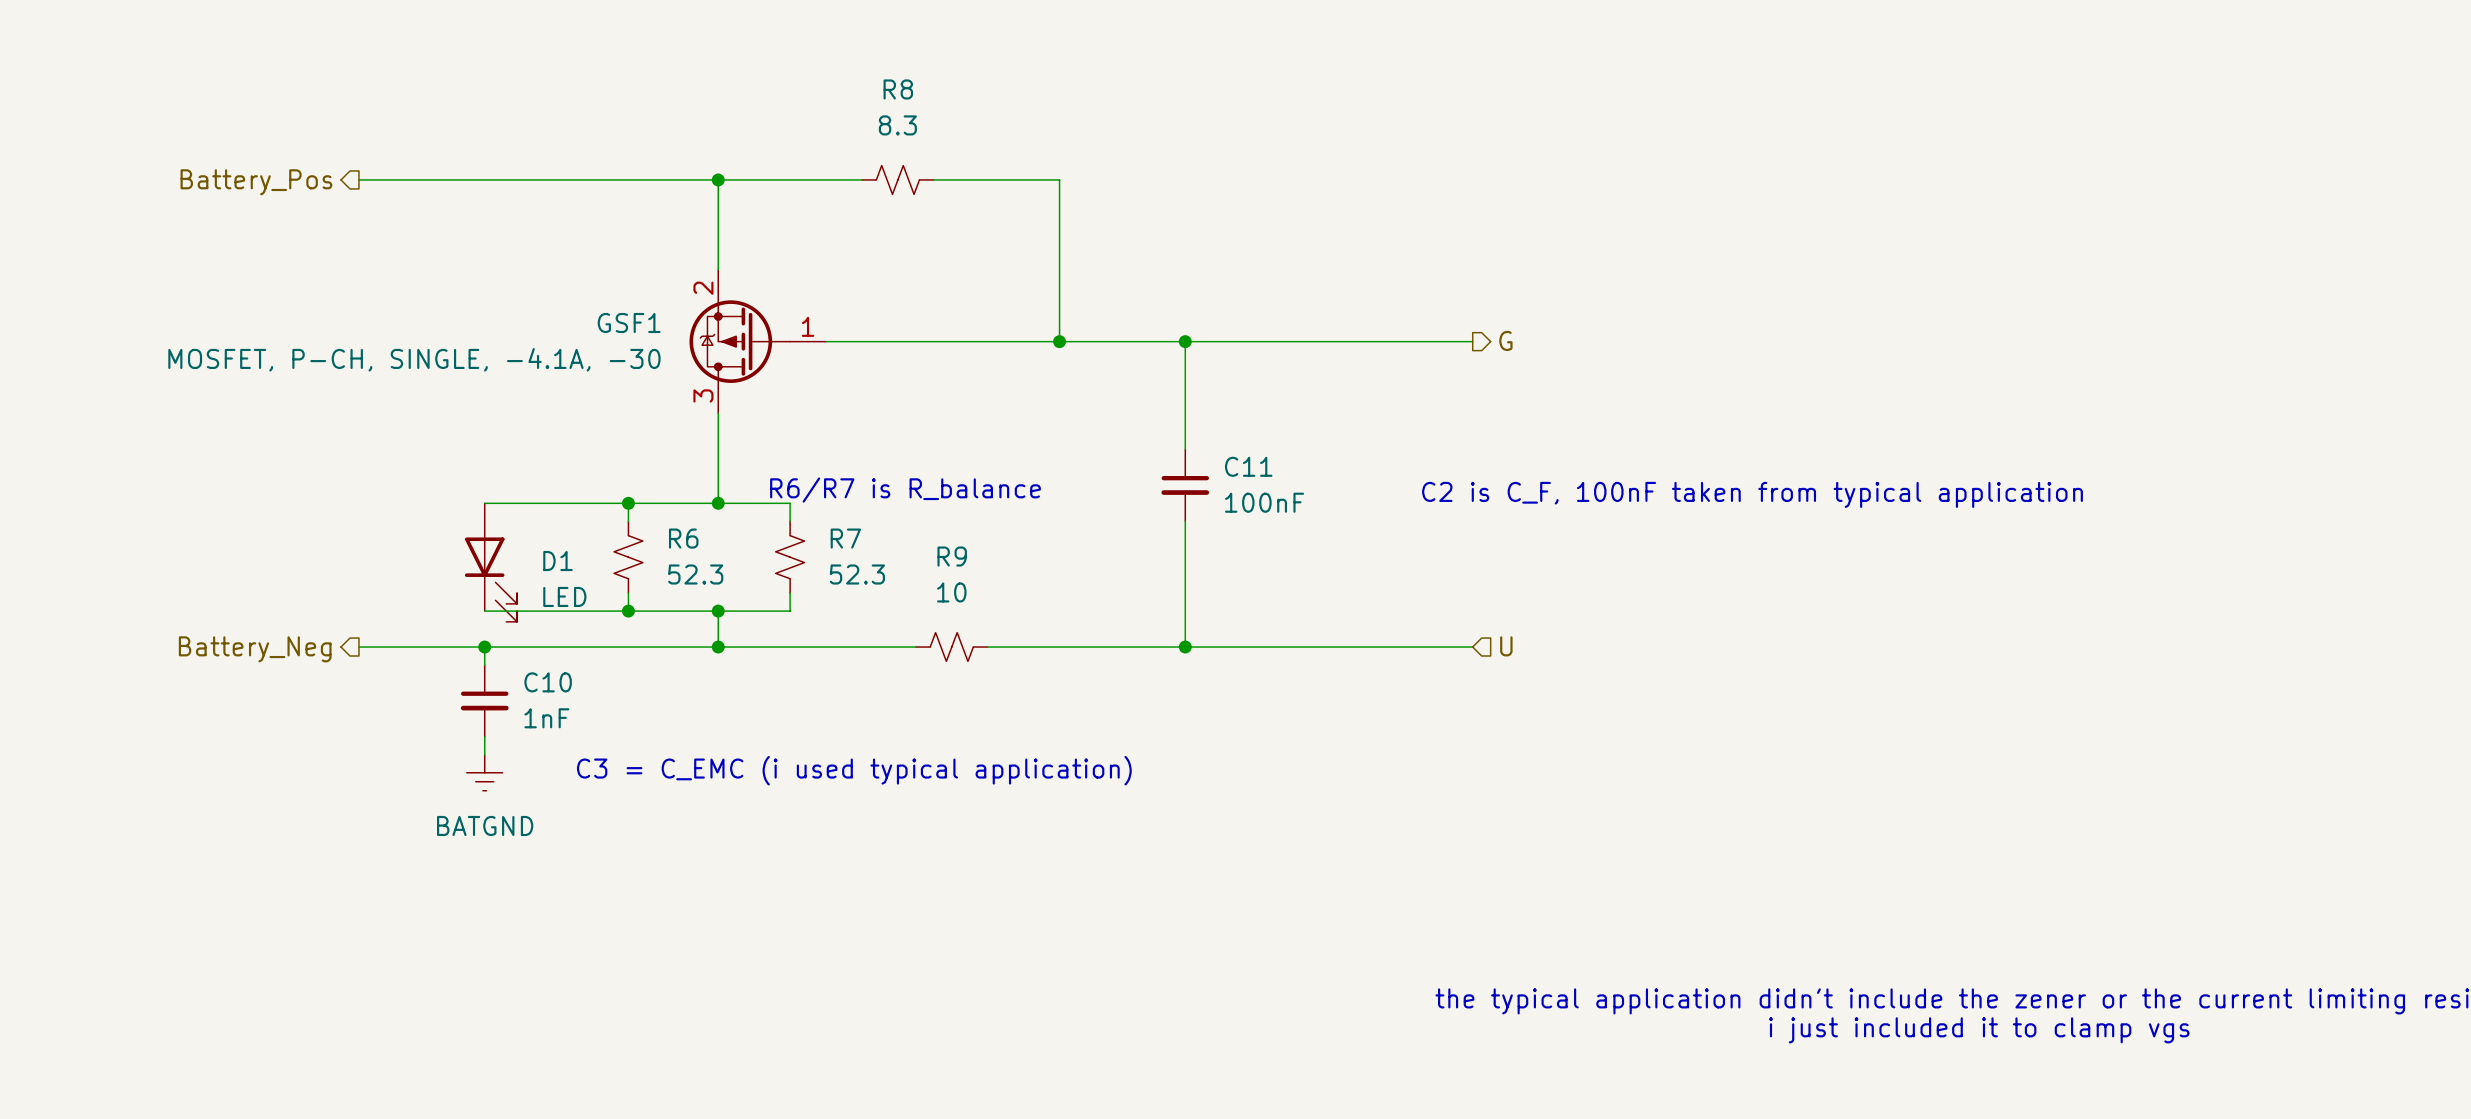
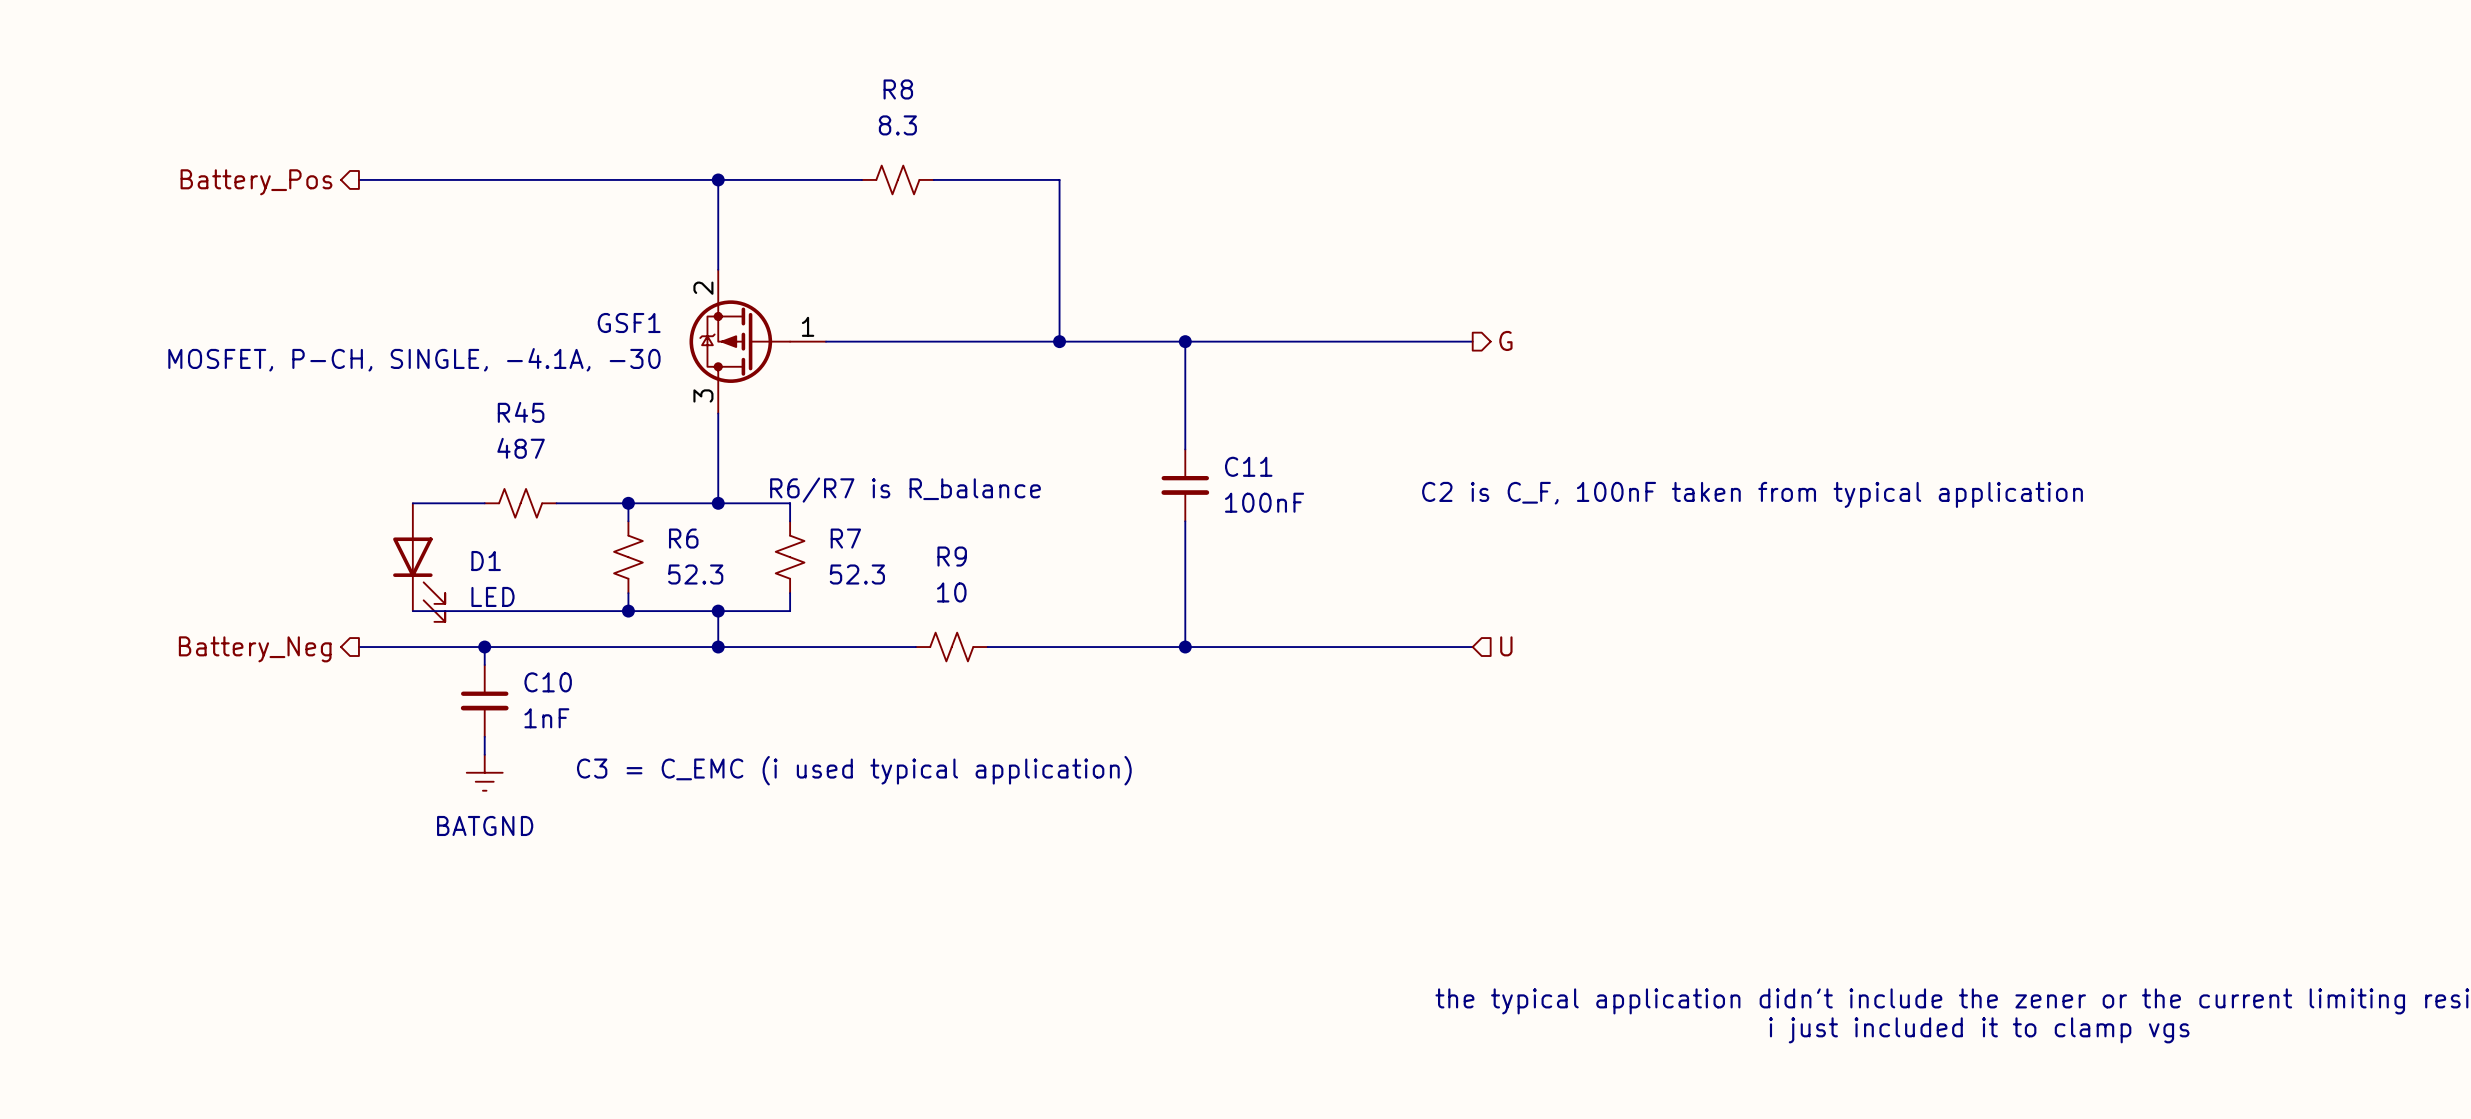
wire: (484, 503) (556, 503) -> (484, 503) (412, 503)
R45: none -> 487 (520, 503)
D1 position: (491, 562) -> (419, 562)
wire: none -> (412, 611) (484, 611)

